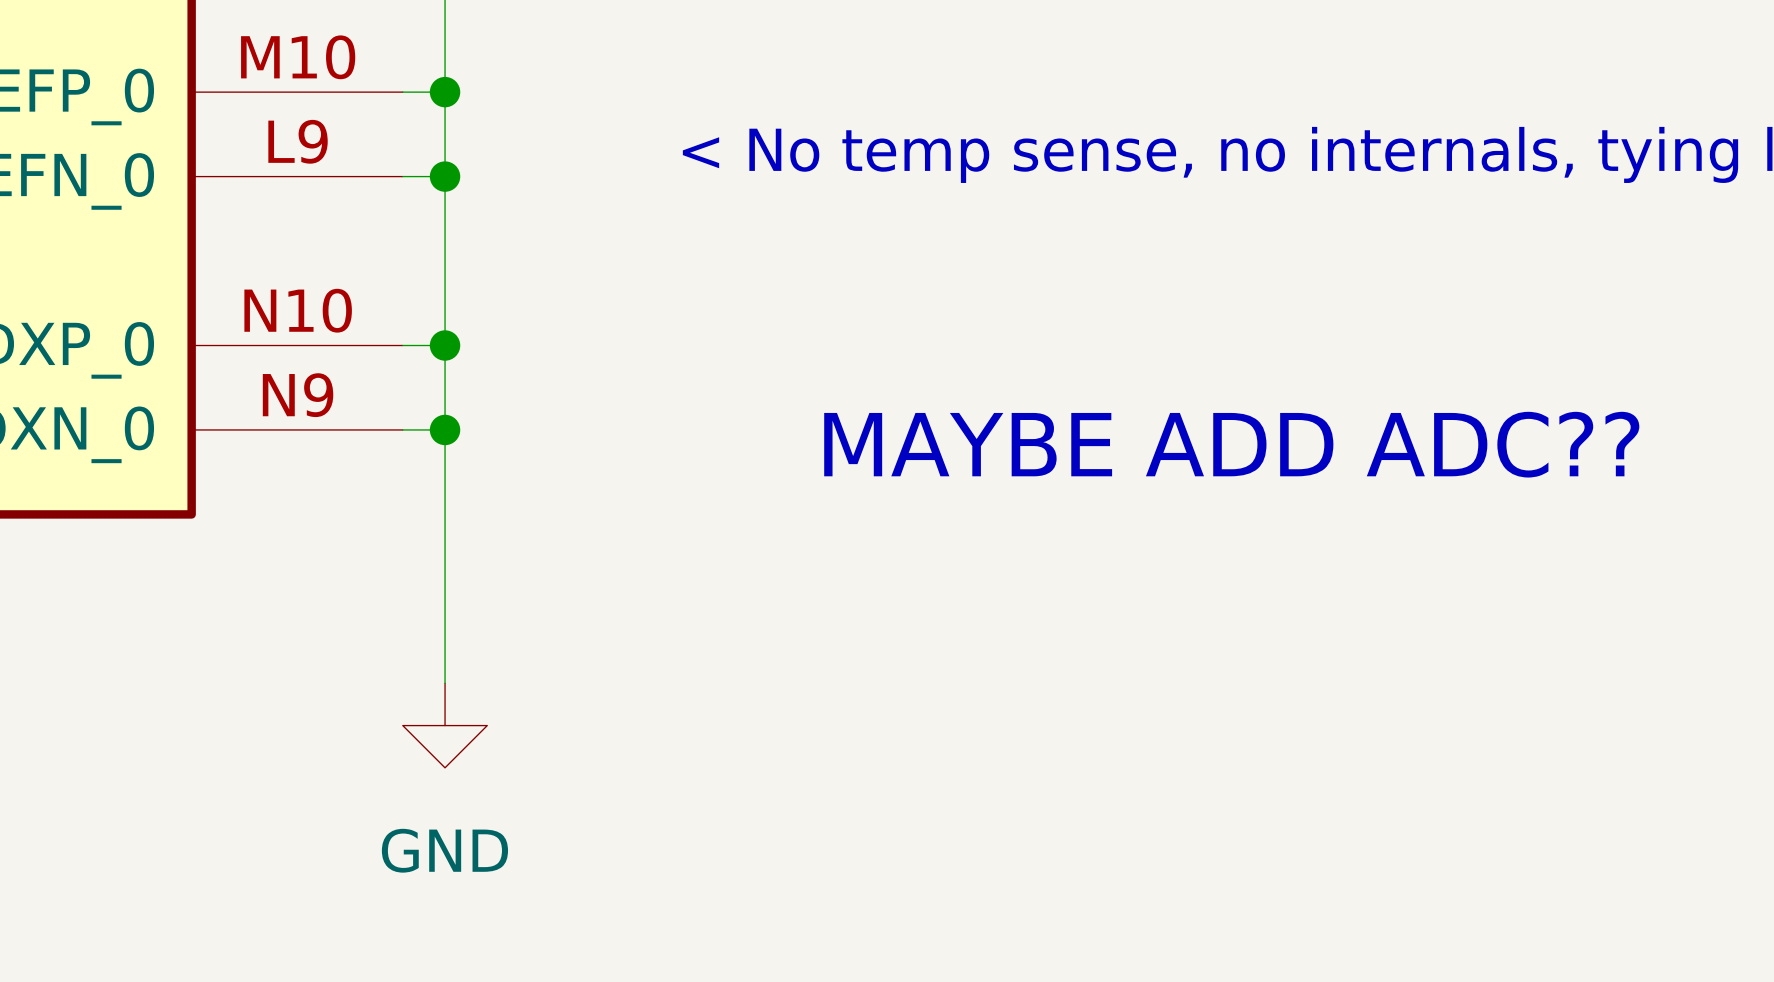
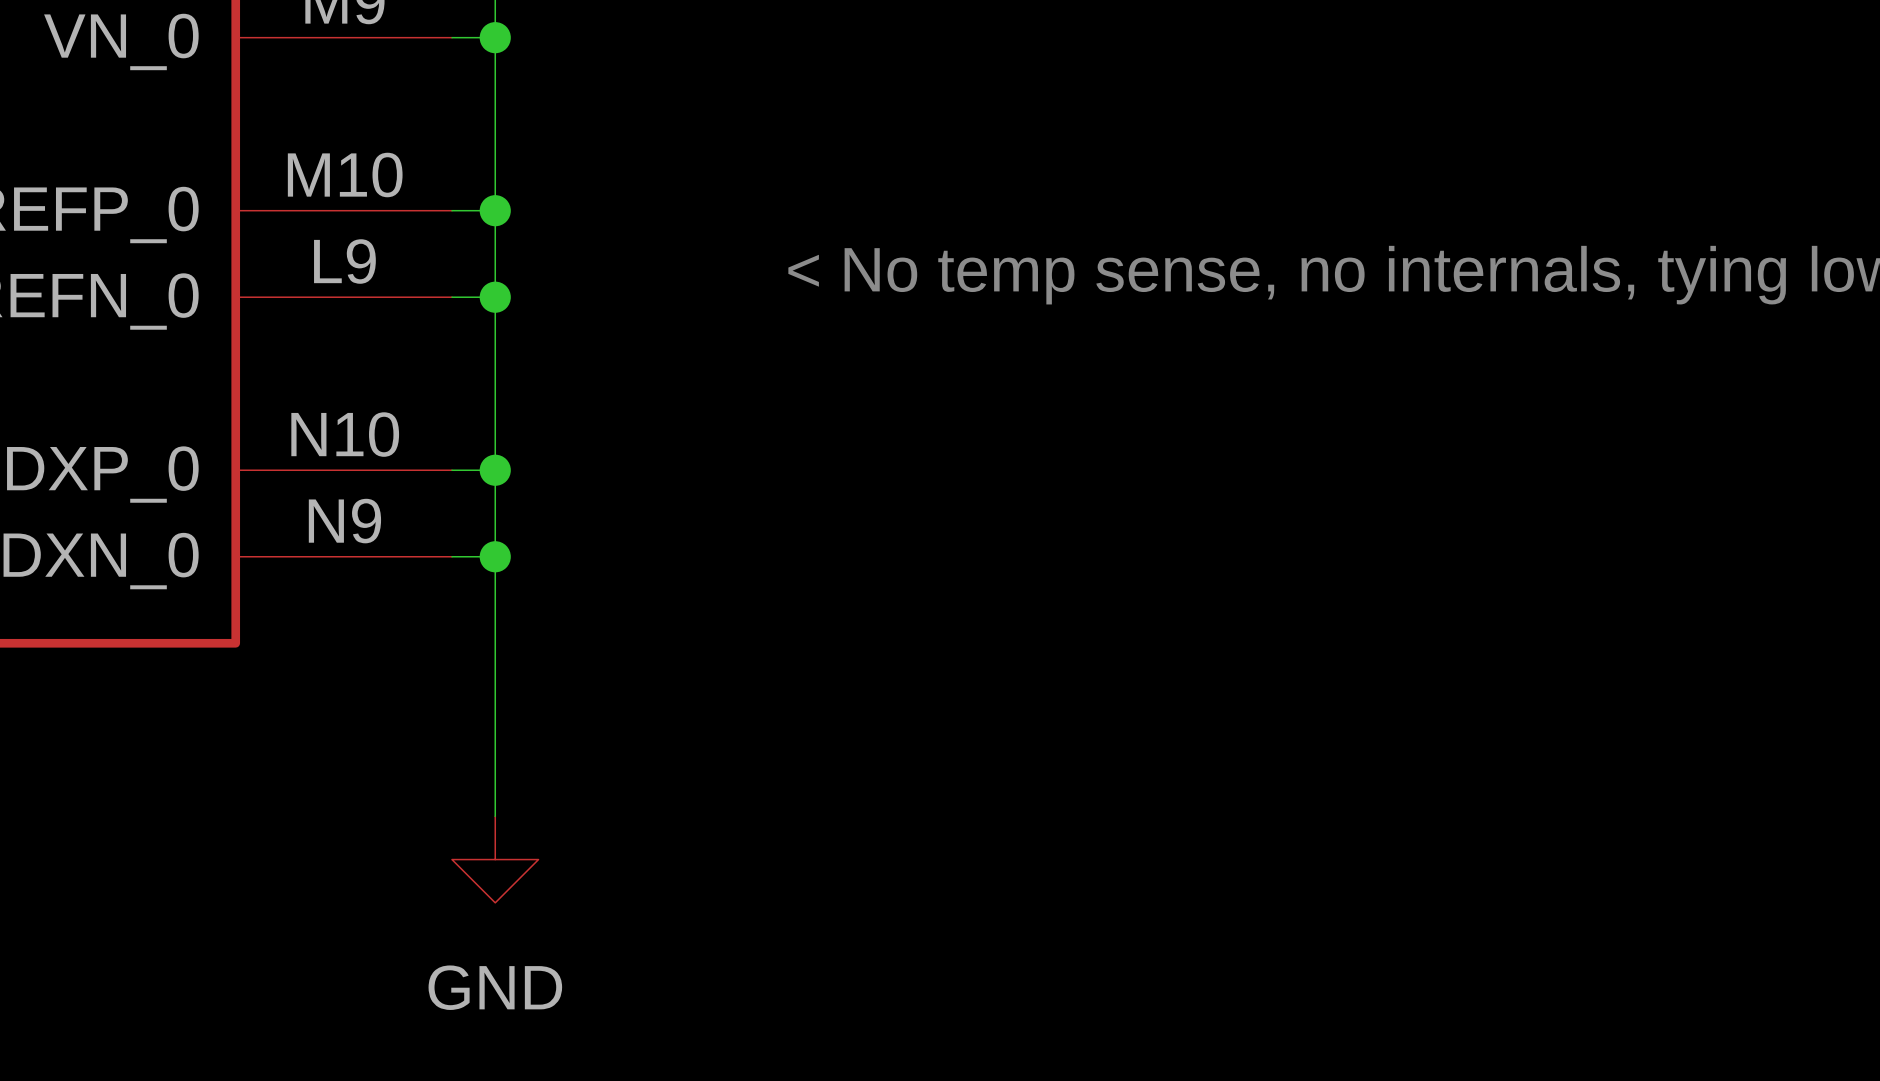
text: MAYBE ADD ADC?? (1231, 444) -> none

